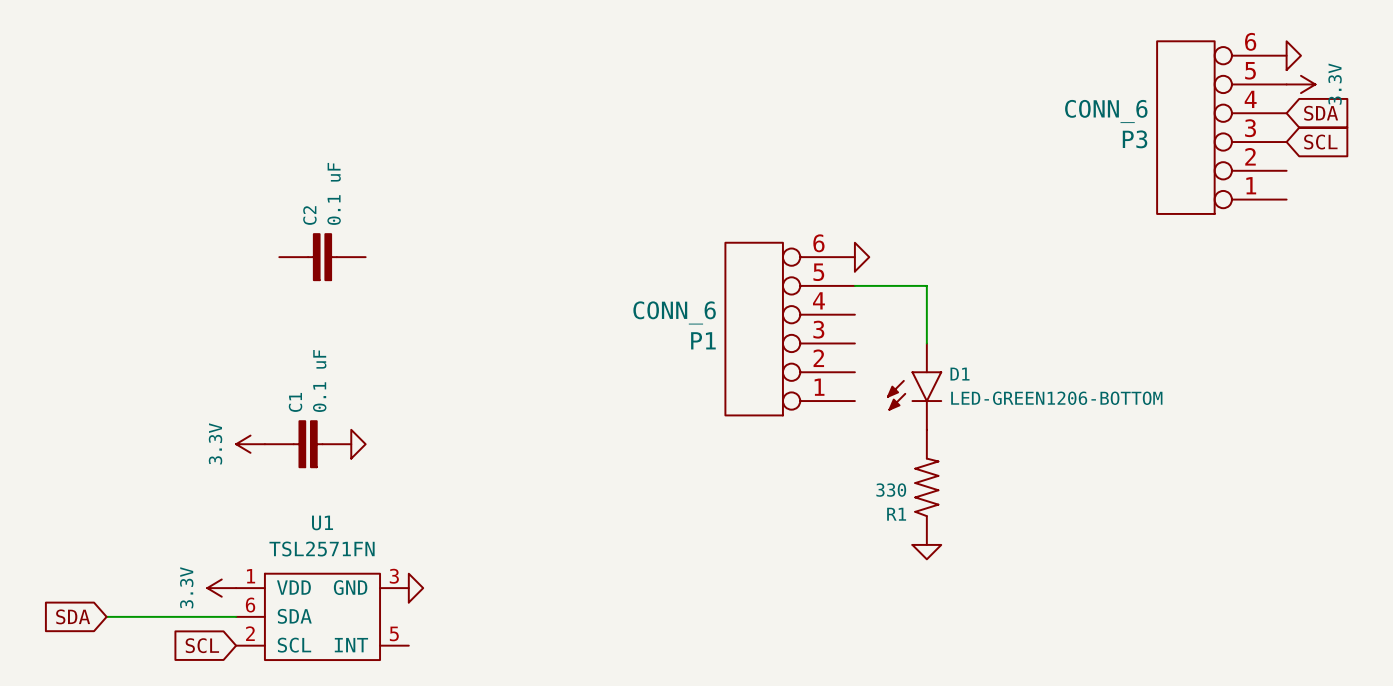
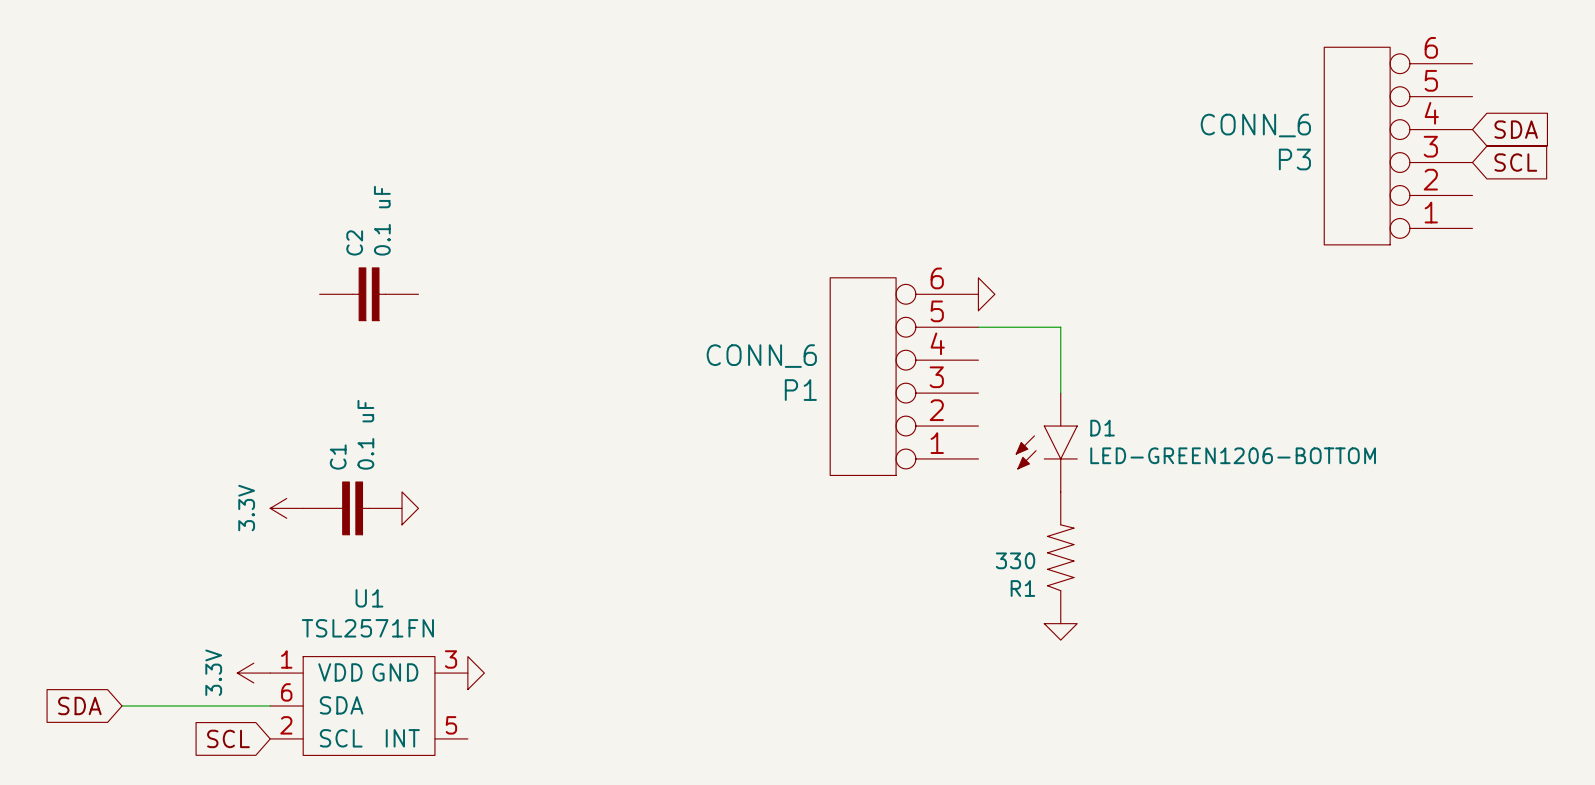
power symbol: (1293, 55) -> none
power symbol: 3.3V (1300, 84) -> none

